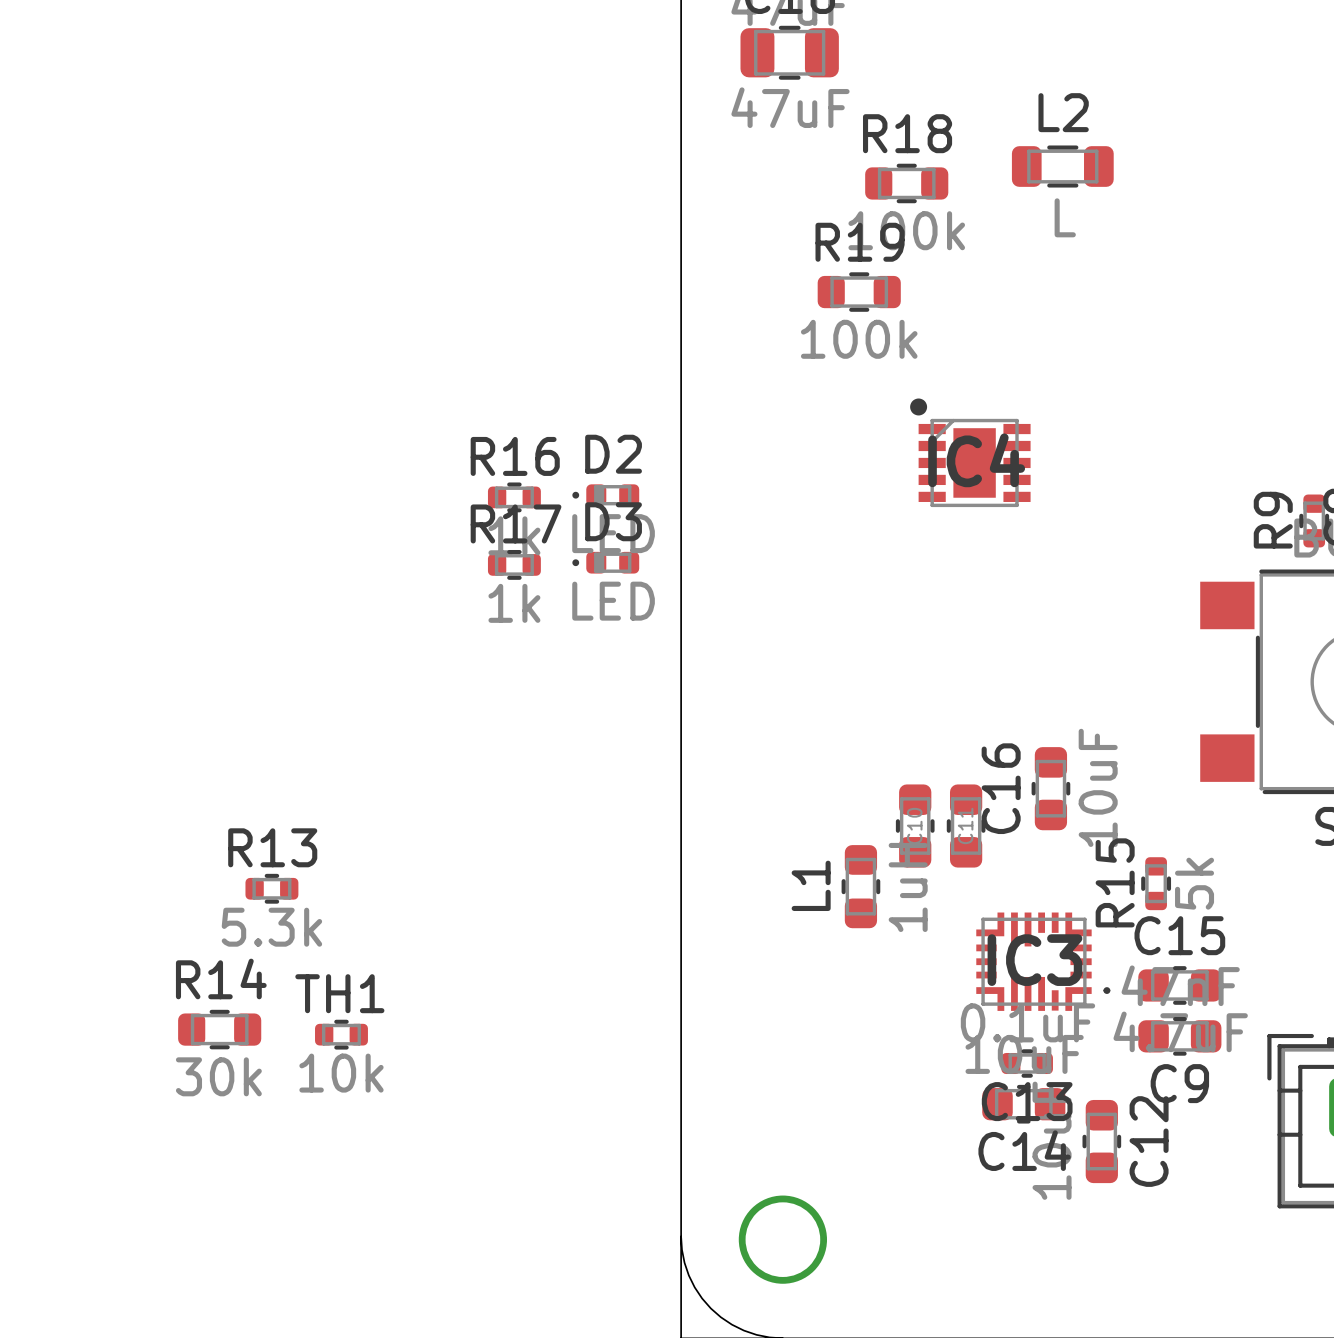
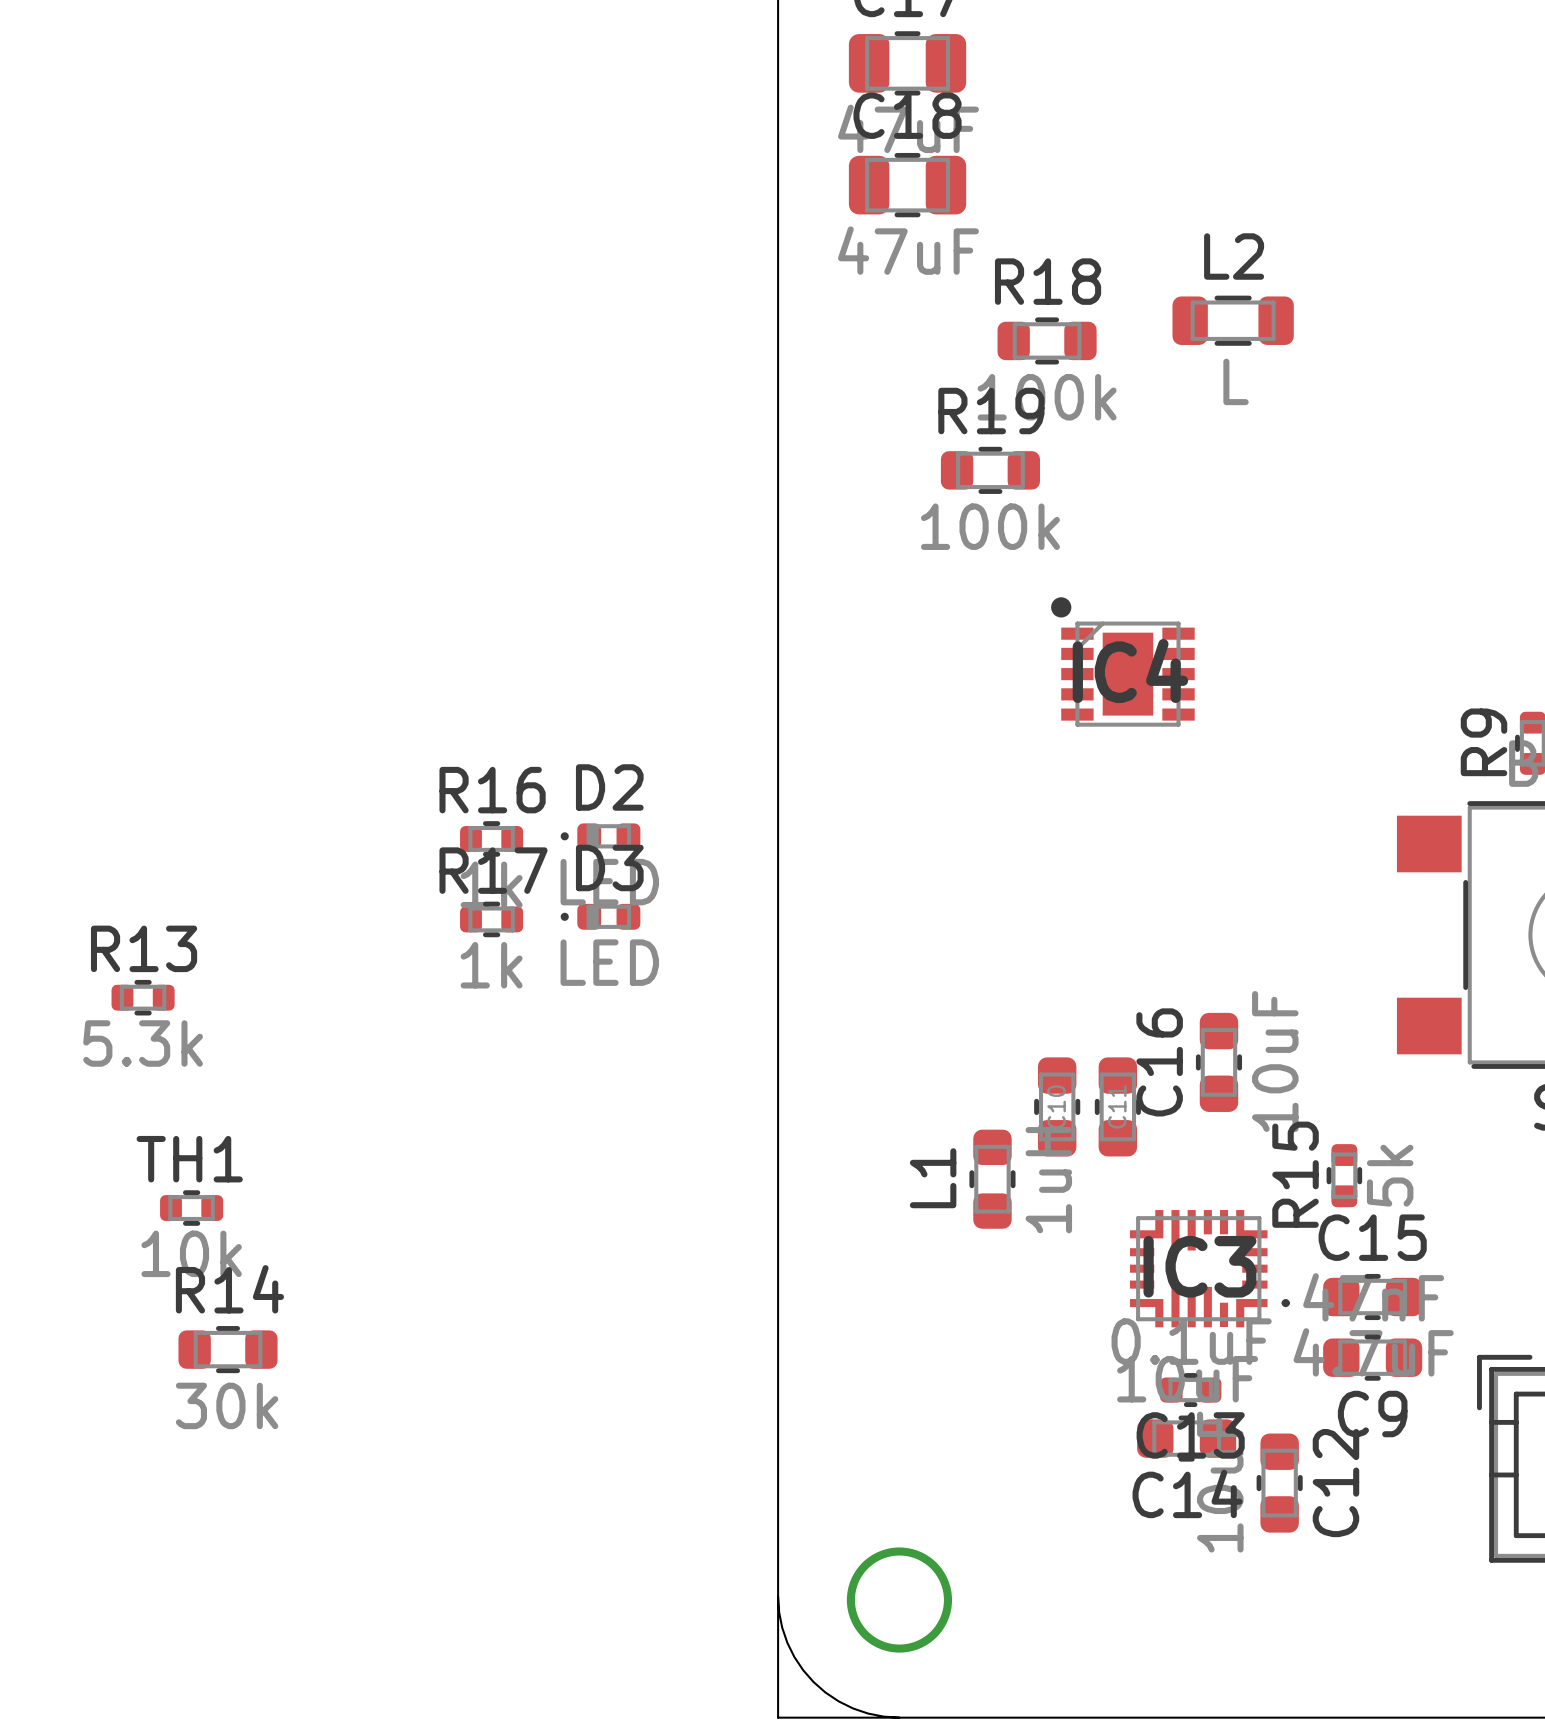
D2 position: (605, 495) -> (600, 836)
R16 position: (514, 497) -> (491, 838)
D3 position: (605, 562) -> (600, 916)
R17 position: (514, 564) -> (491, 919)
R13 position: (271, 888) -> (143, 997)
TH1 position: (341, 1034) -> (191, 1208)

